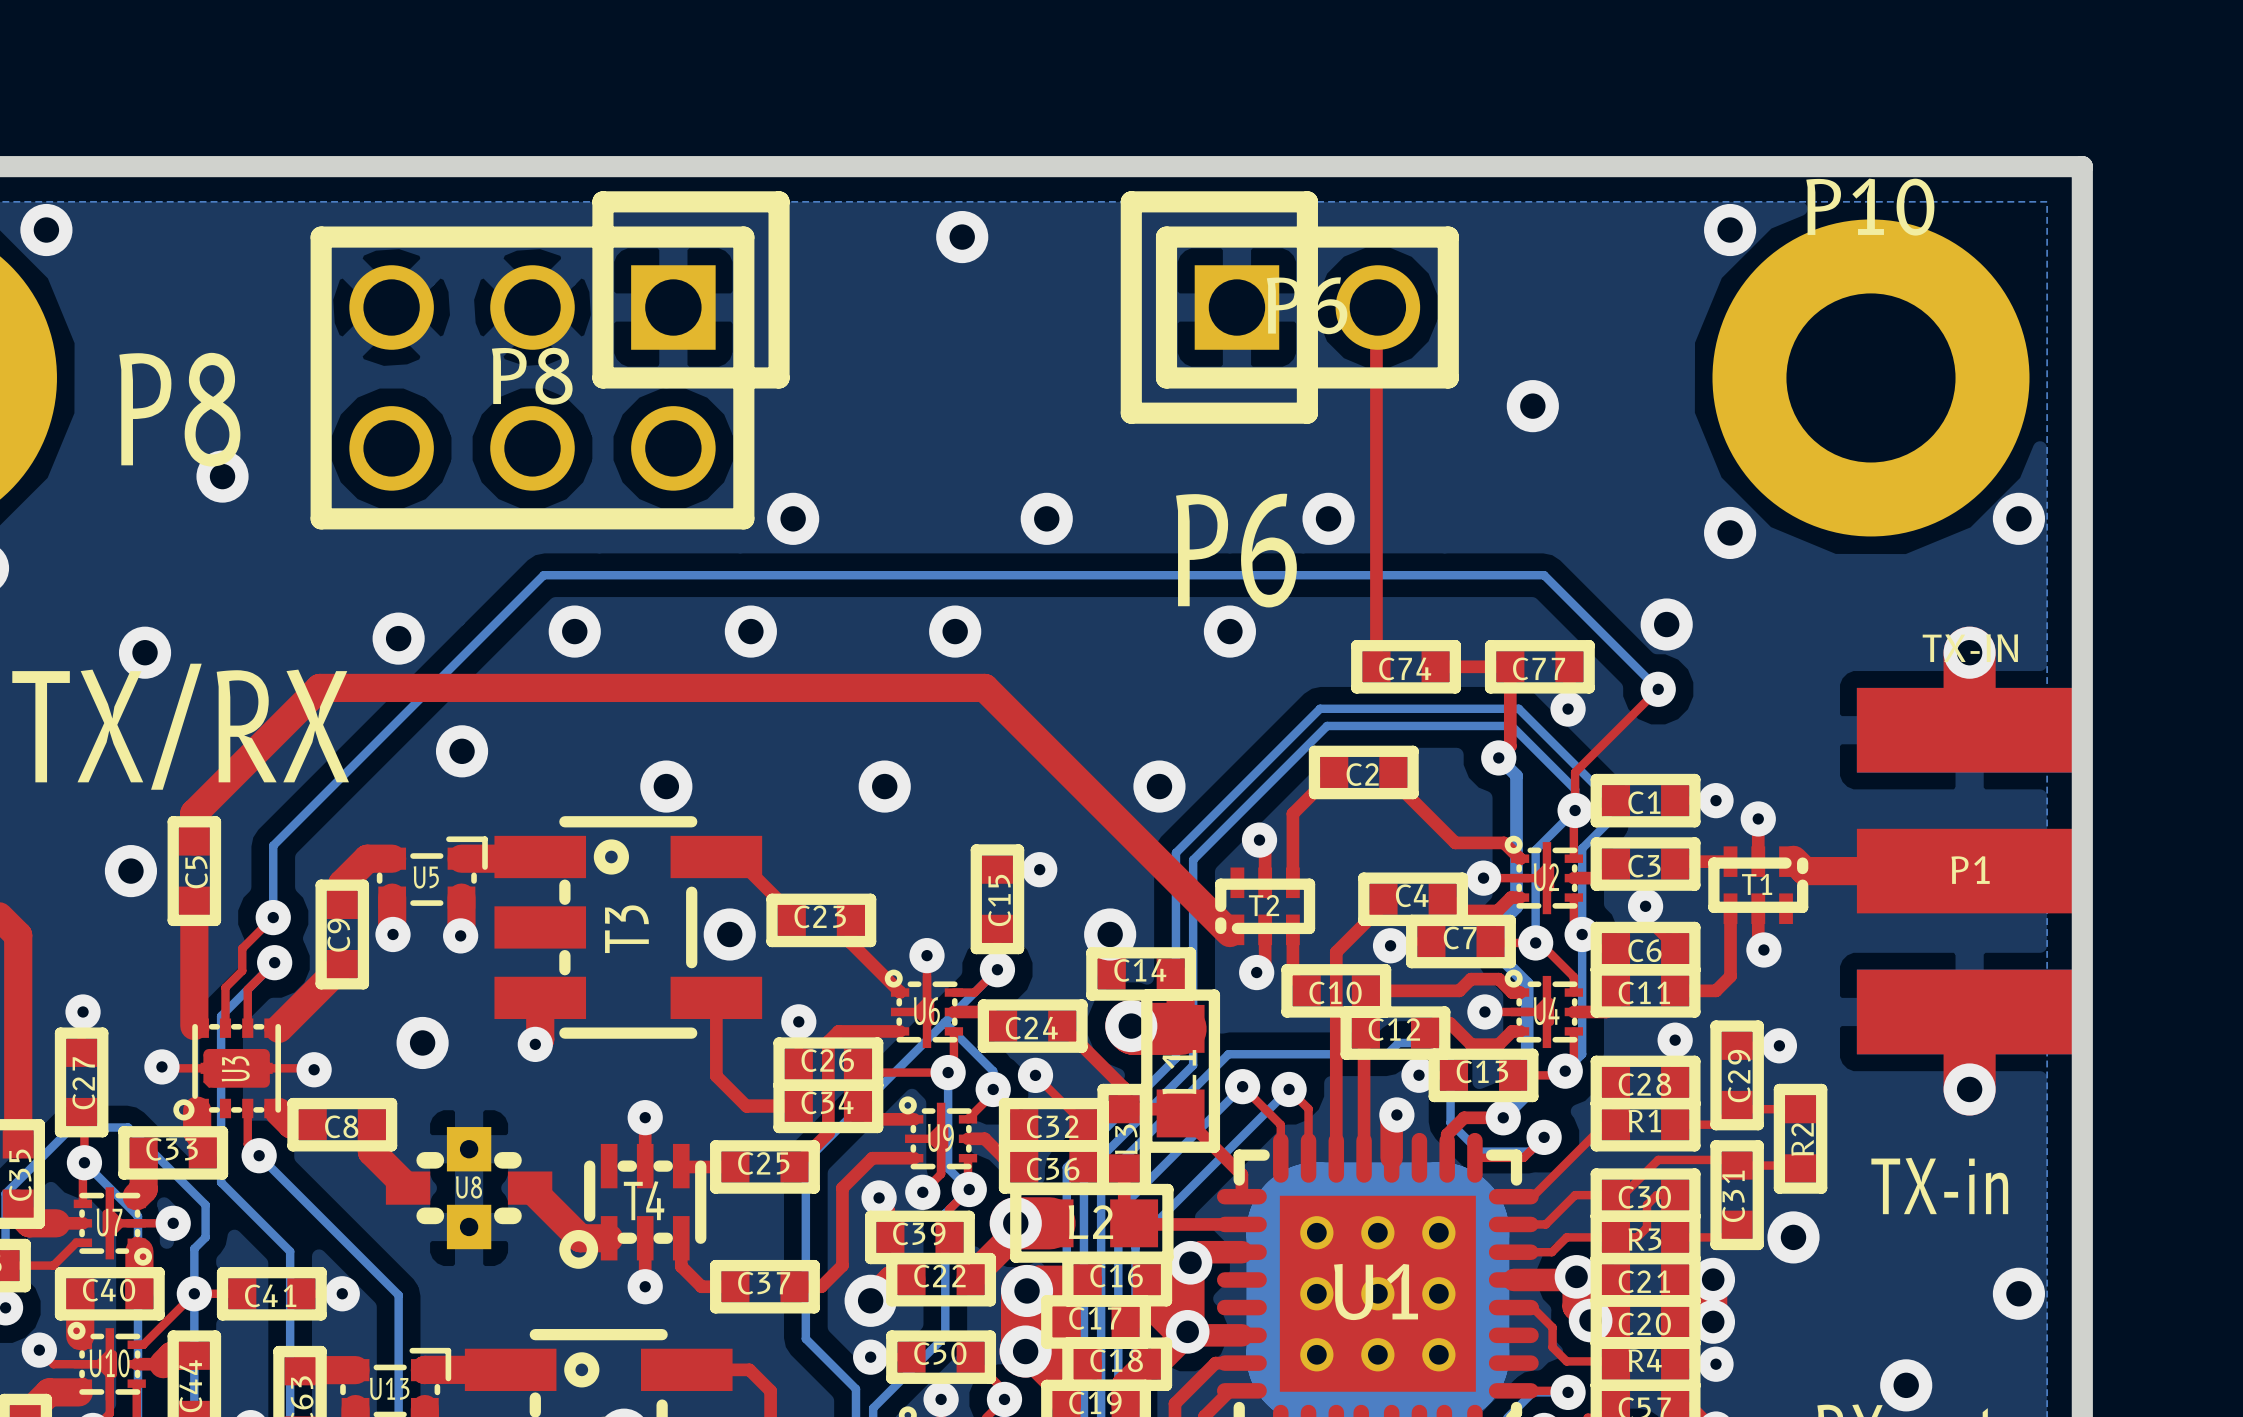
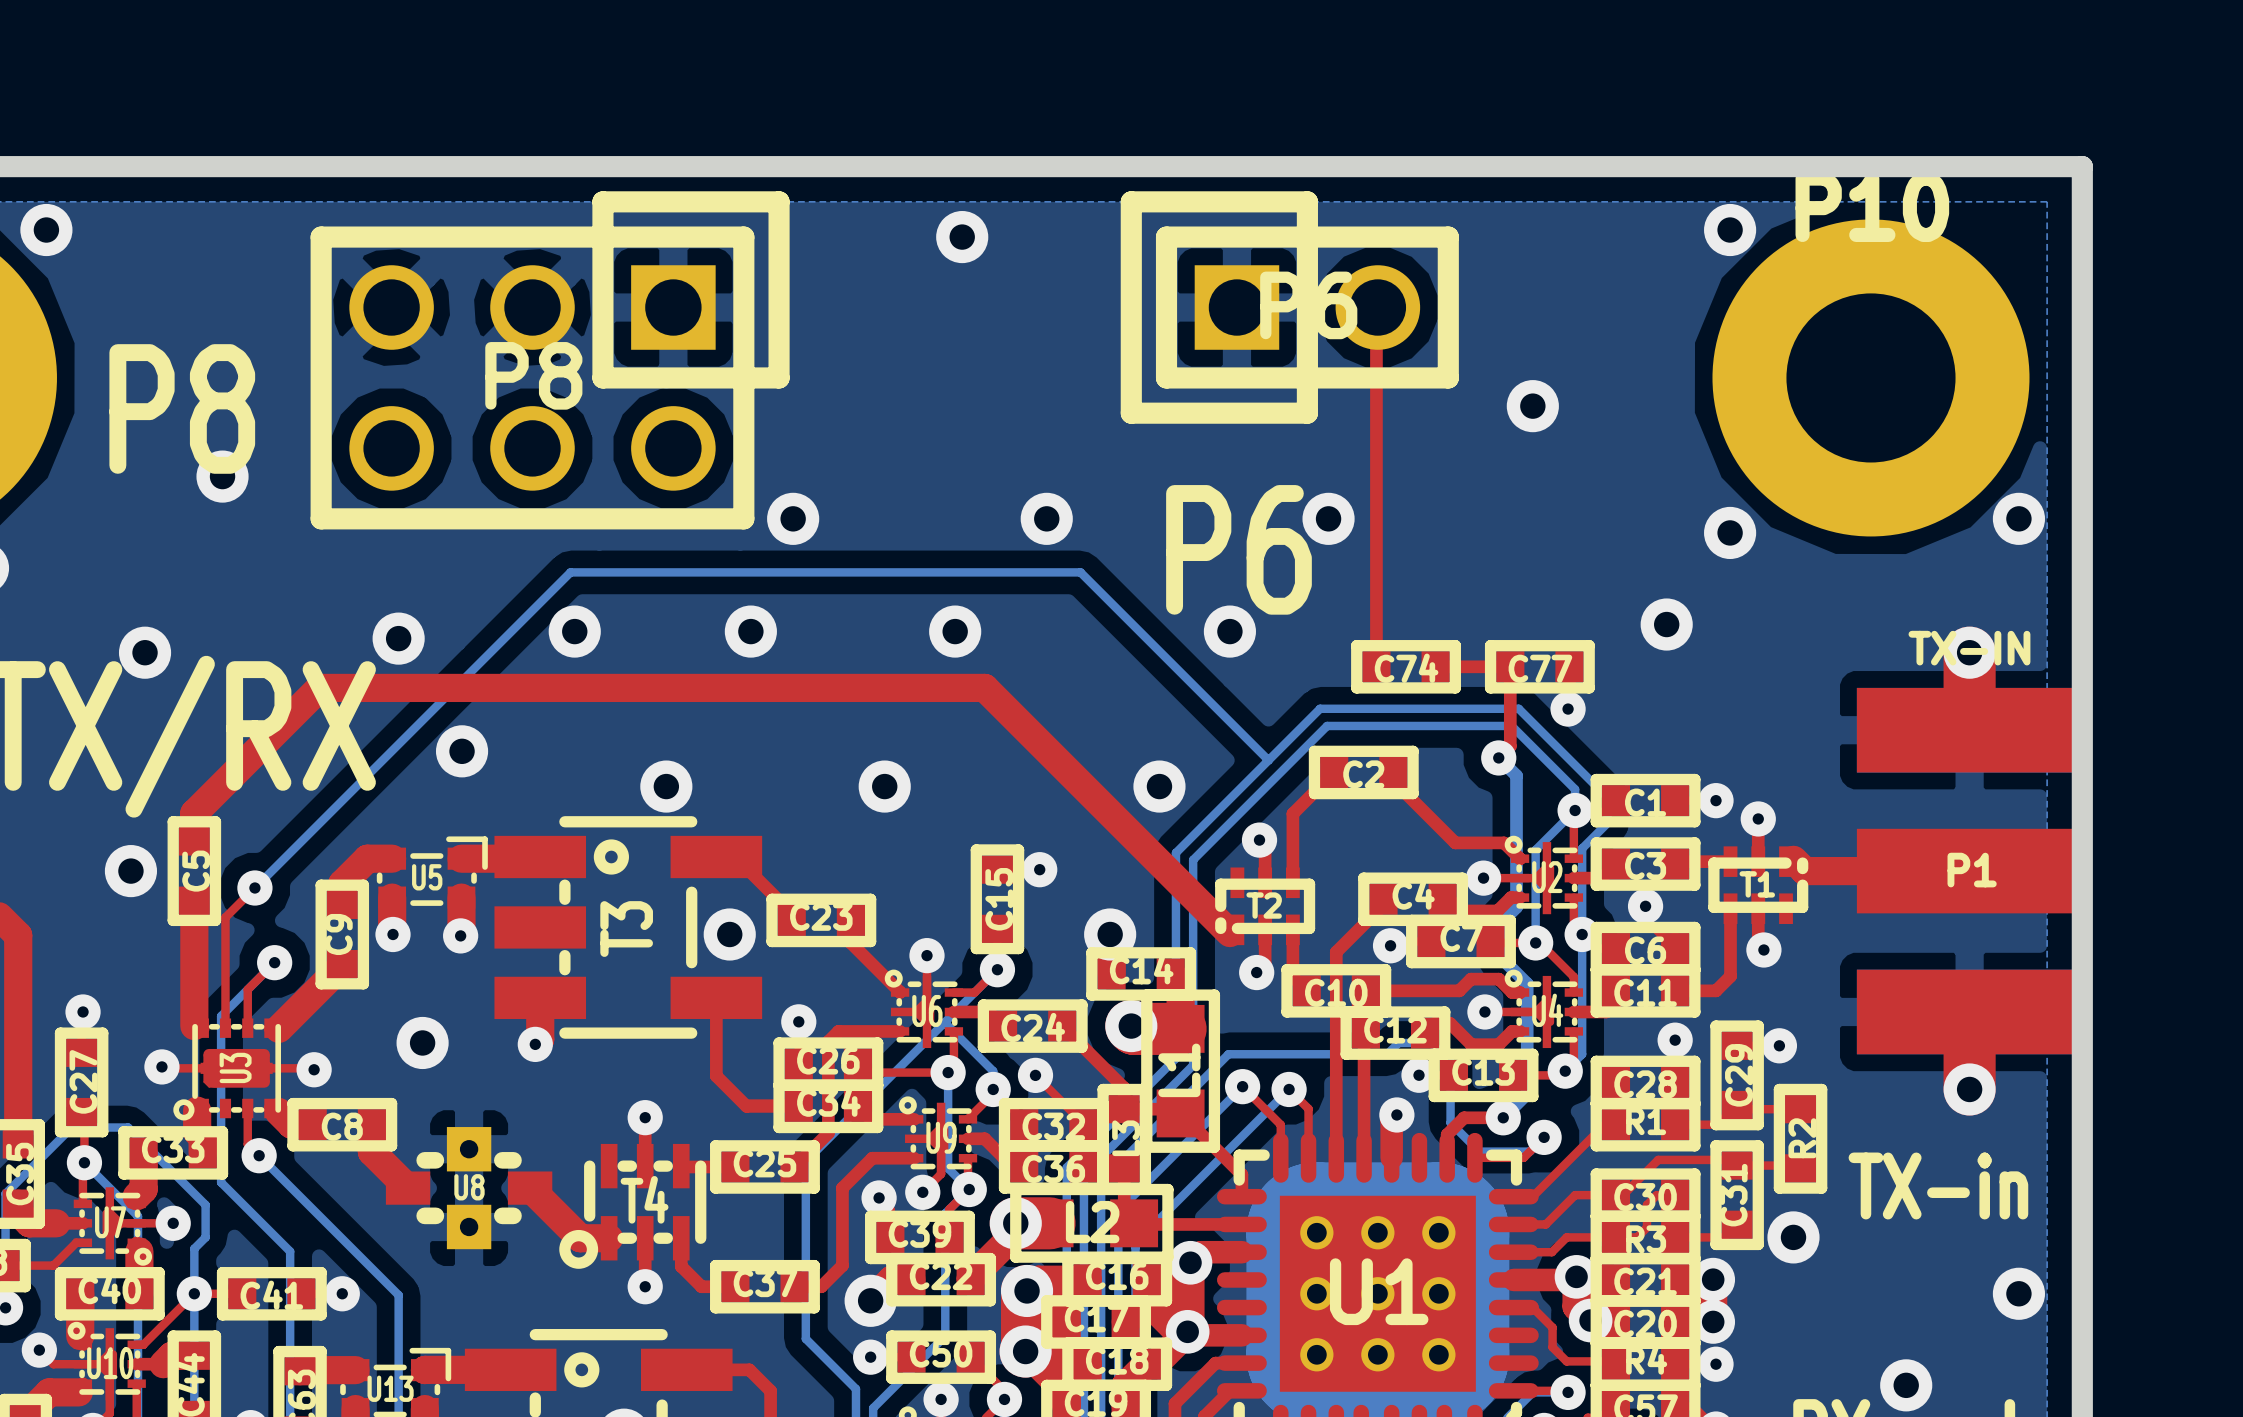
top track: (1658, 689) (1575, 772) (1575, 810) -> none
bottom track: (1658, 689) (1544, 575) (543, 575) (273, 845) (273, 917) -> none
via: (1658, 689) -> none
bottom track: none -> (1268, 760) (1080, 572) (570, 572) (254, 888)
top track: (273, 917) (242, 948) (242, 970) (225, 987) -> (254, 888) (225, 917) (225, 987)
via position: (273, 917) -> (254, 888)

